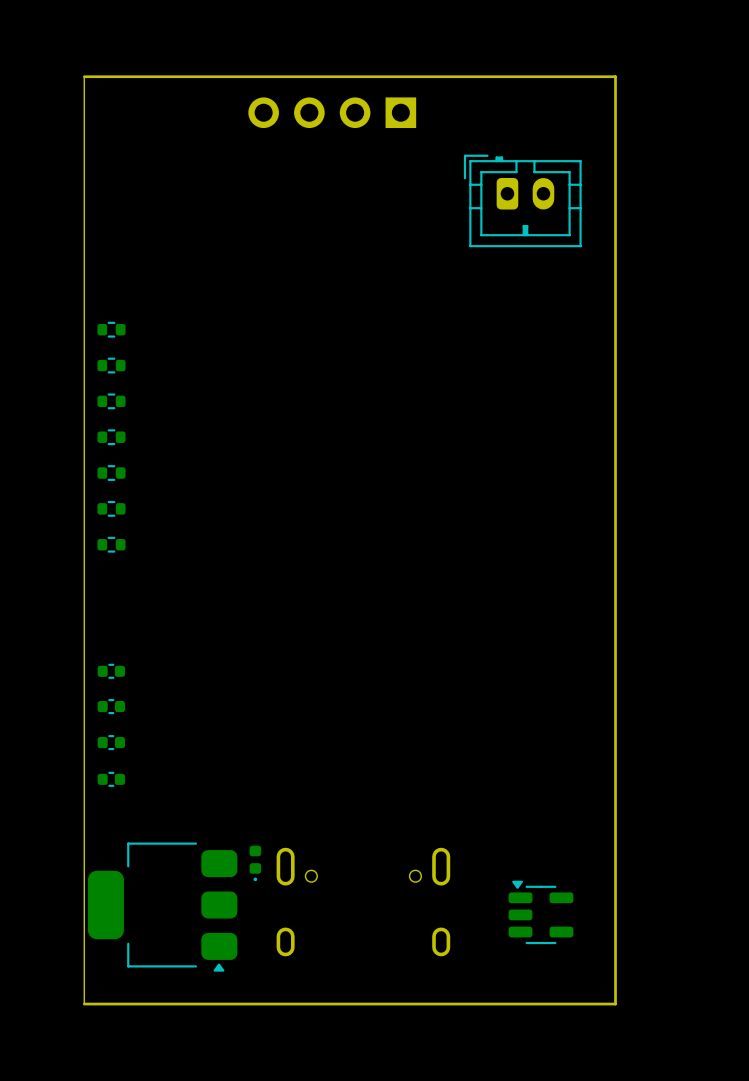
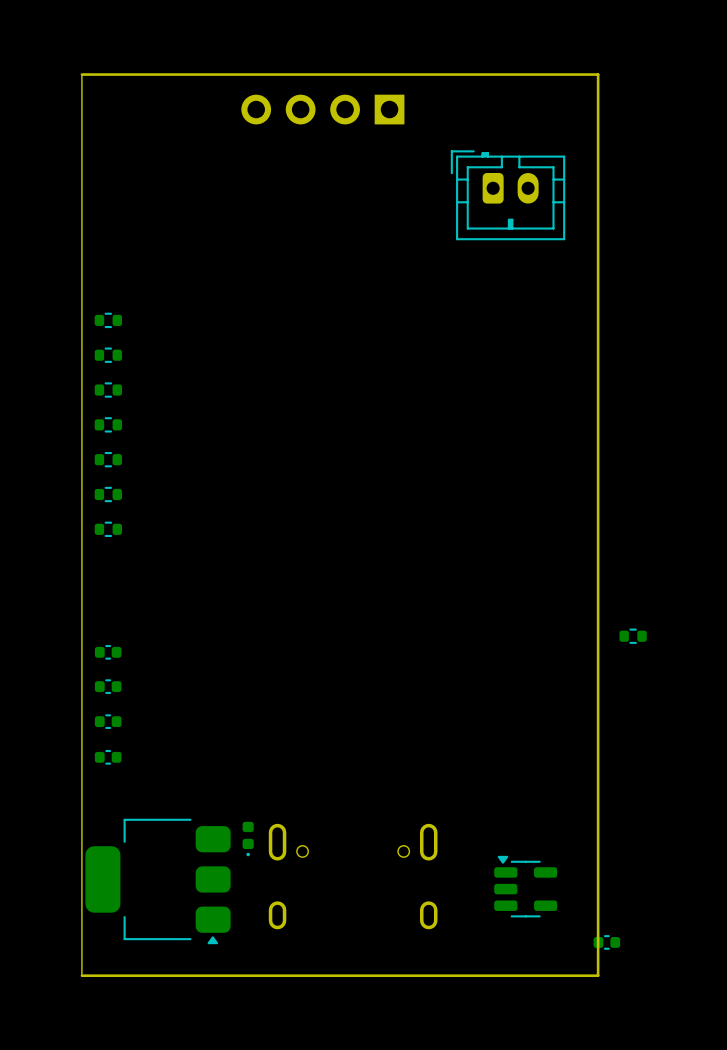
part: none -> (633, 636)
part: none -> (606, 942)

